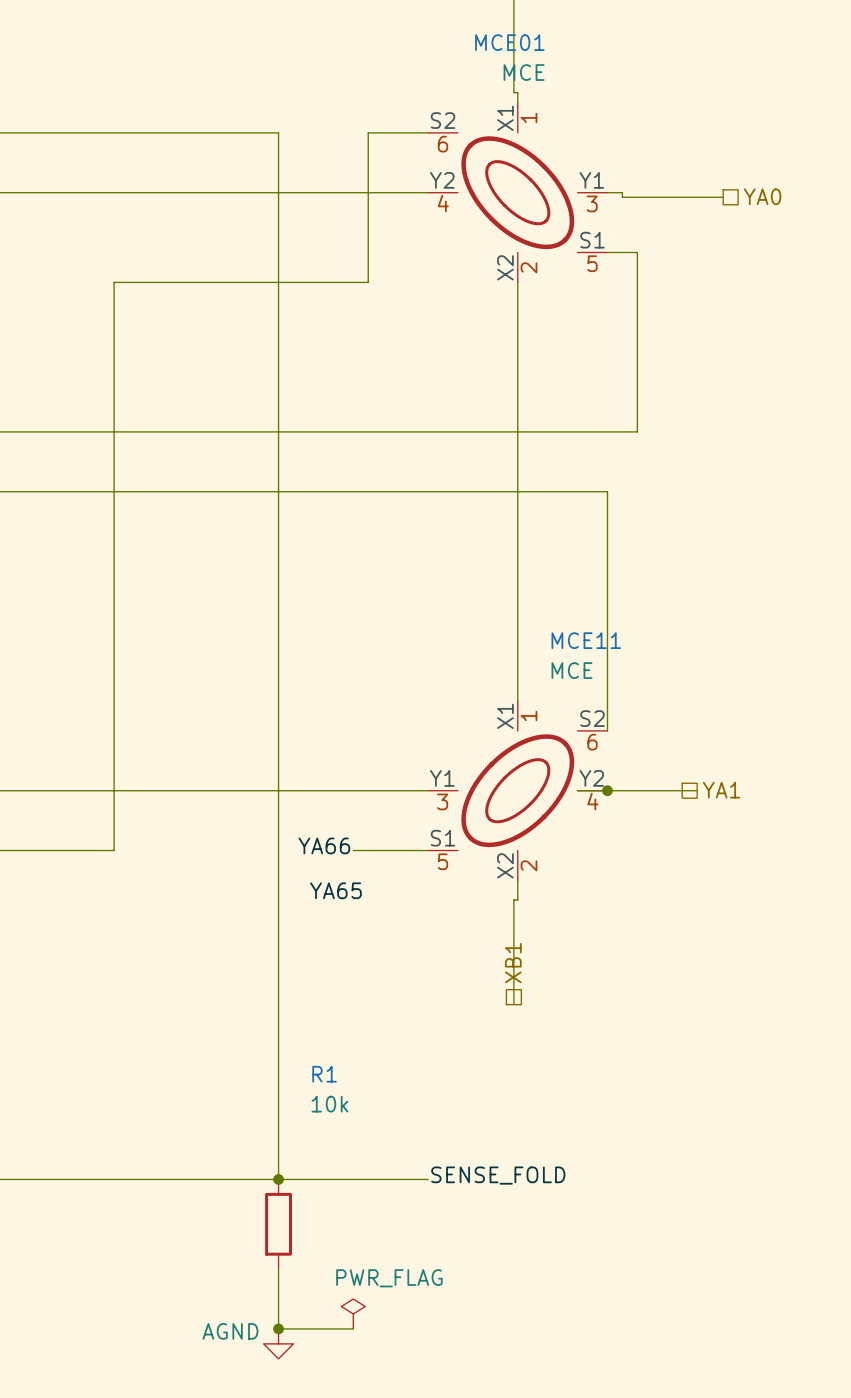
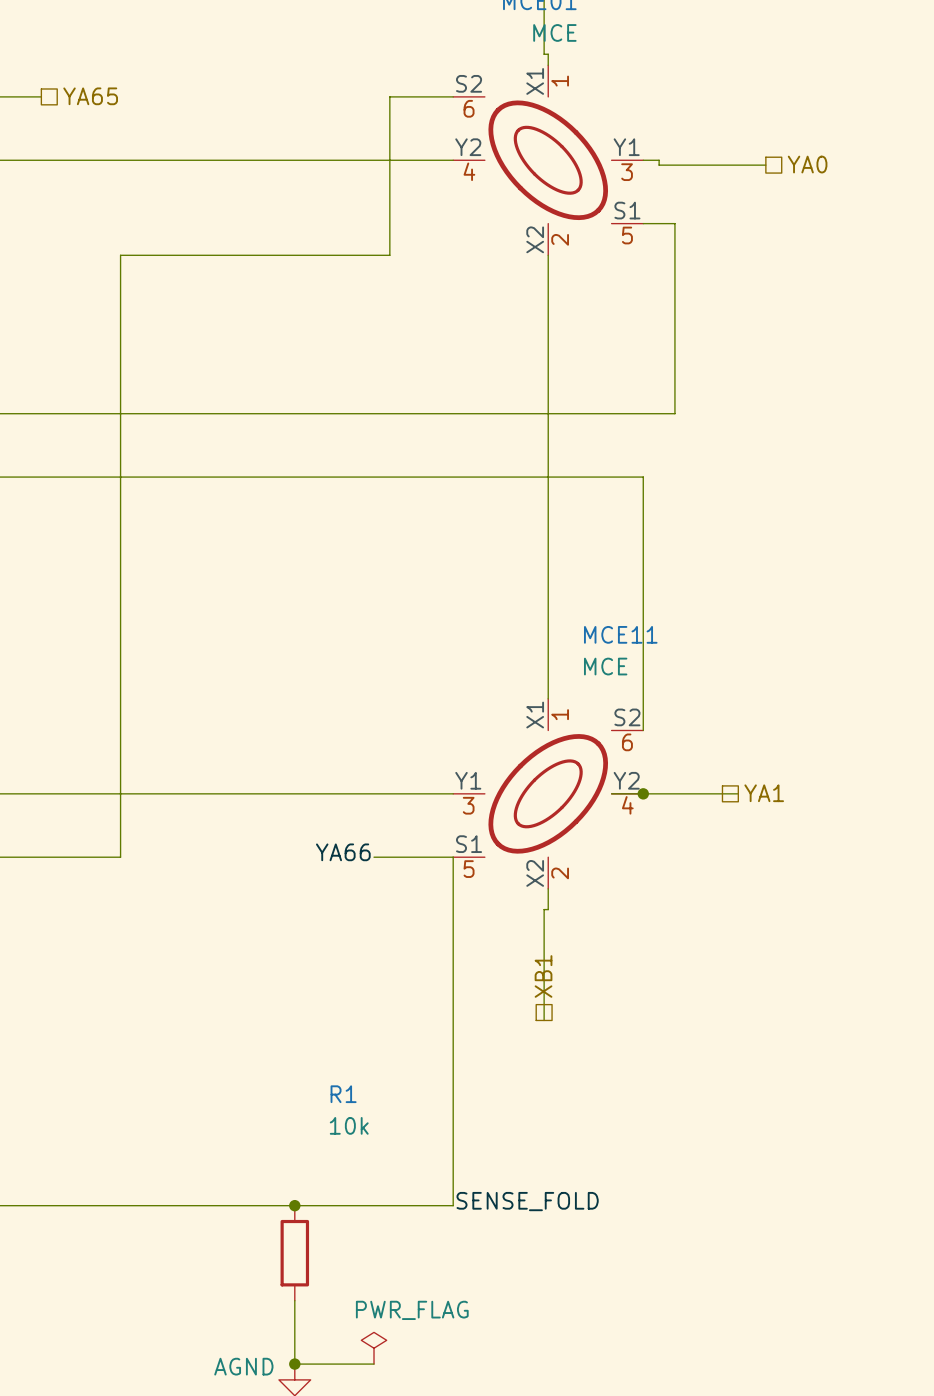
wire: (39, 132) (278, 132) (278, 1179) -> none
hierarchical label: none -> YA65 (90, 96)
wire: none -> (453, 857) (453, 1205)
label: YA65 (335, 890) -> none

